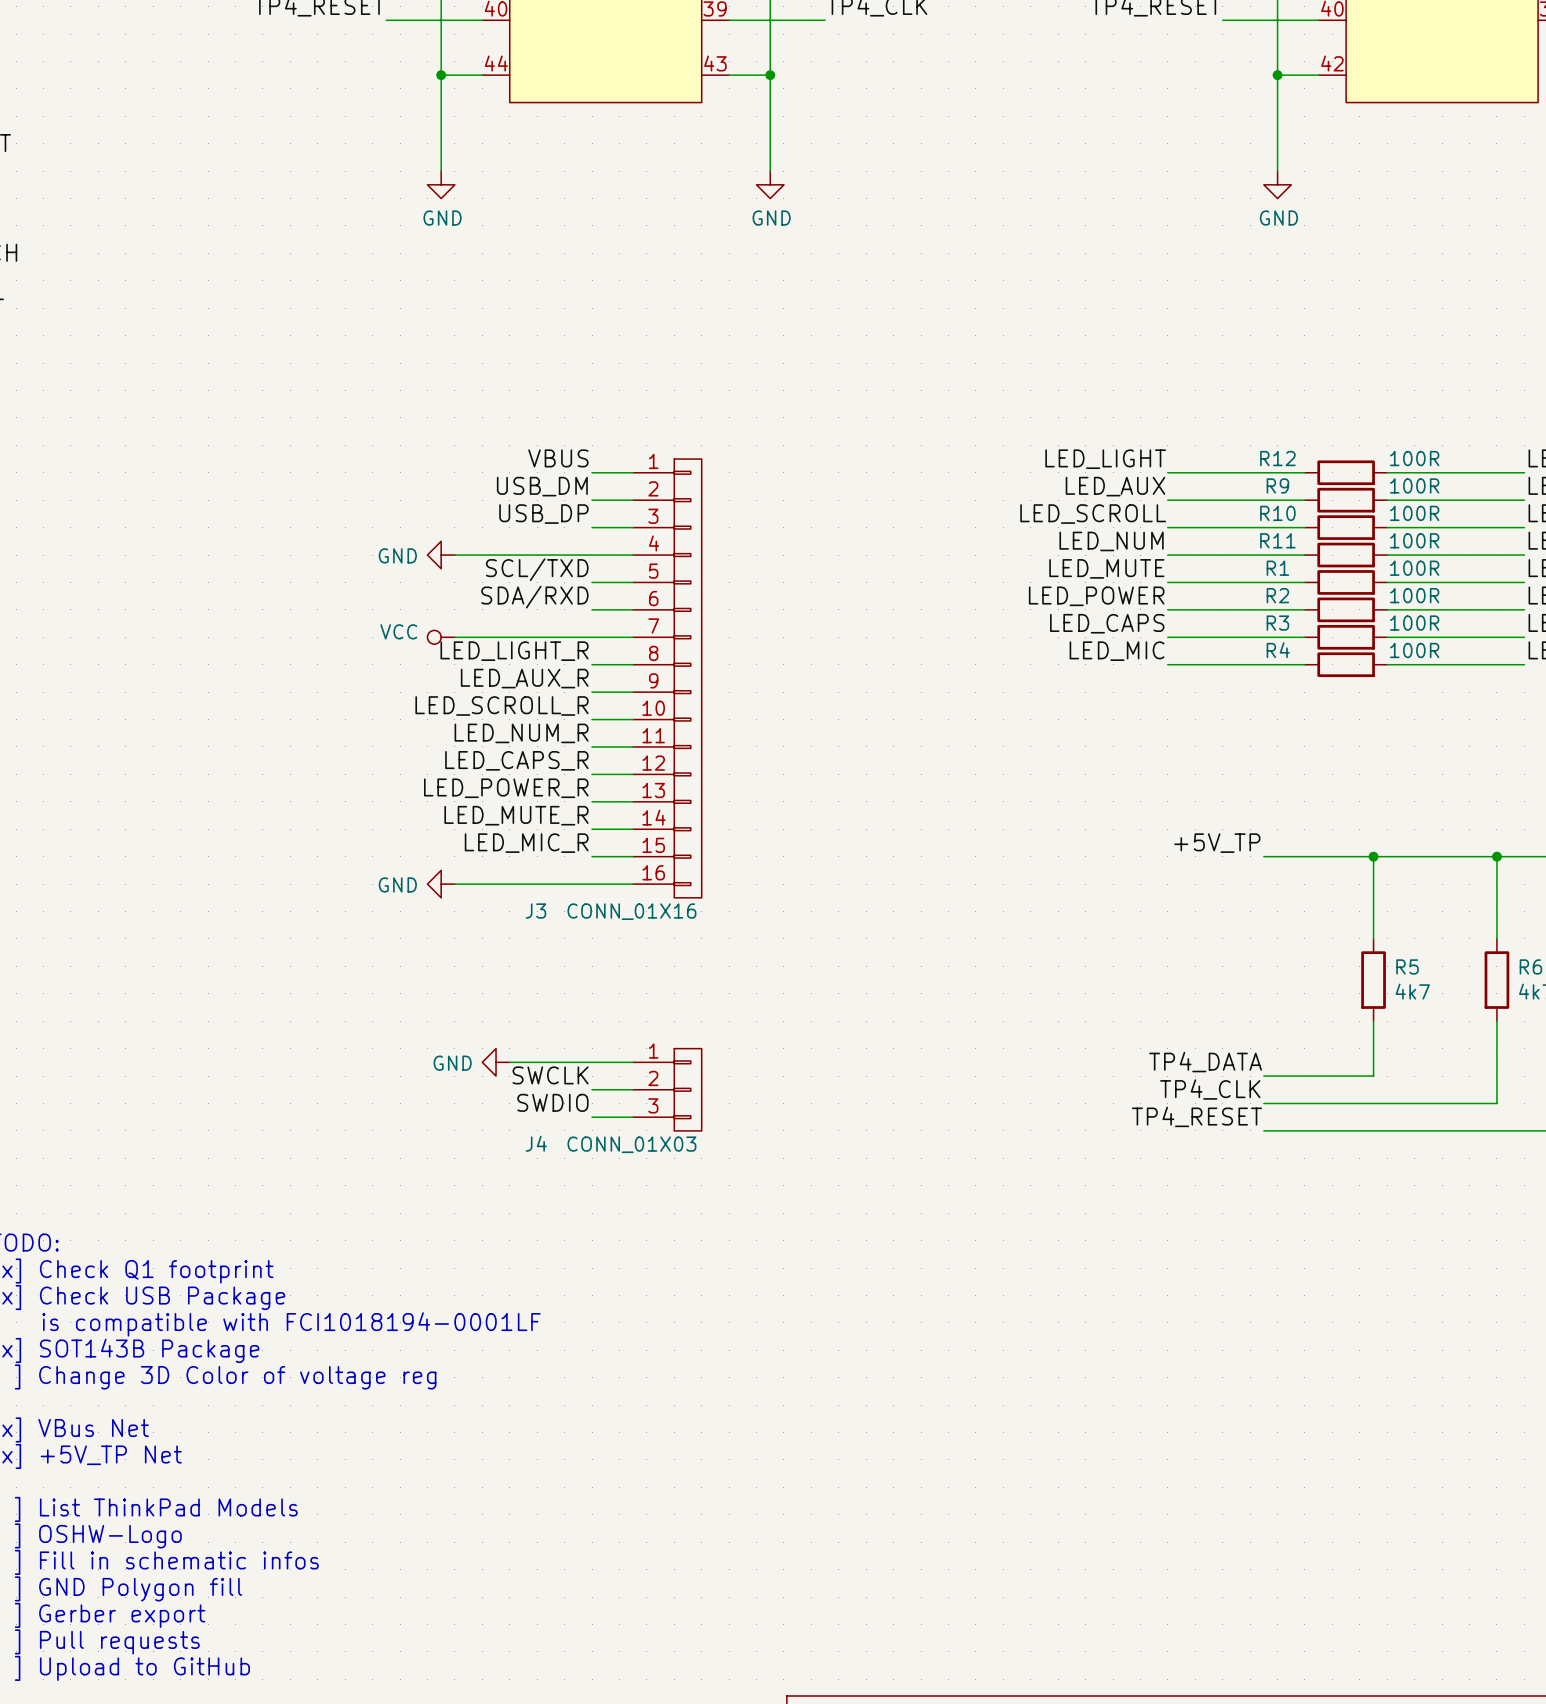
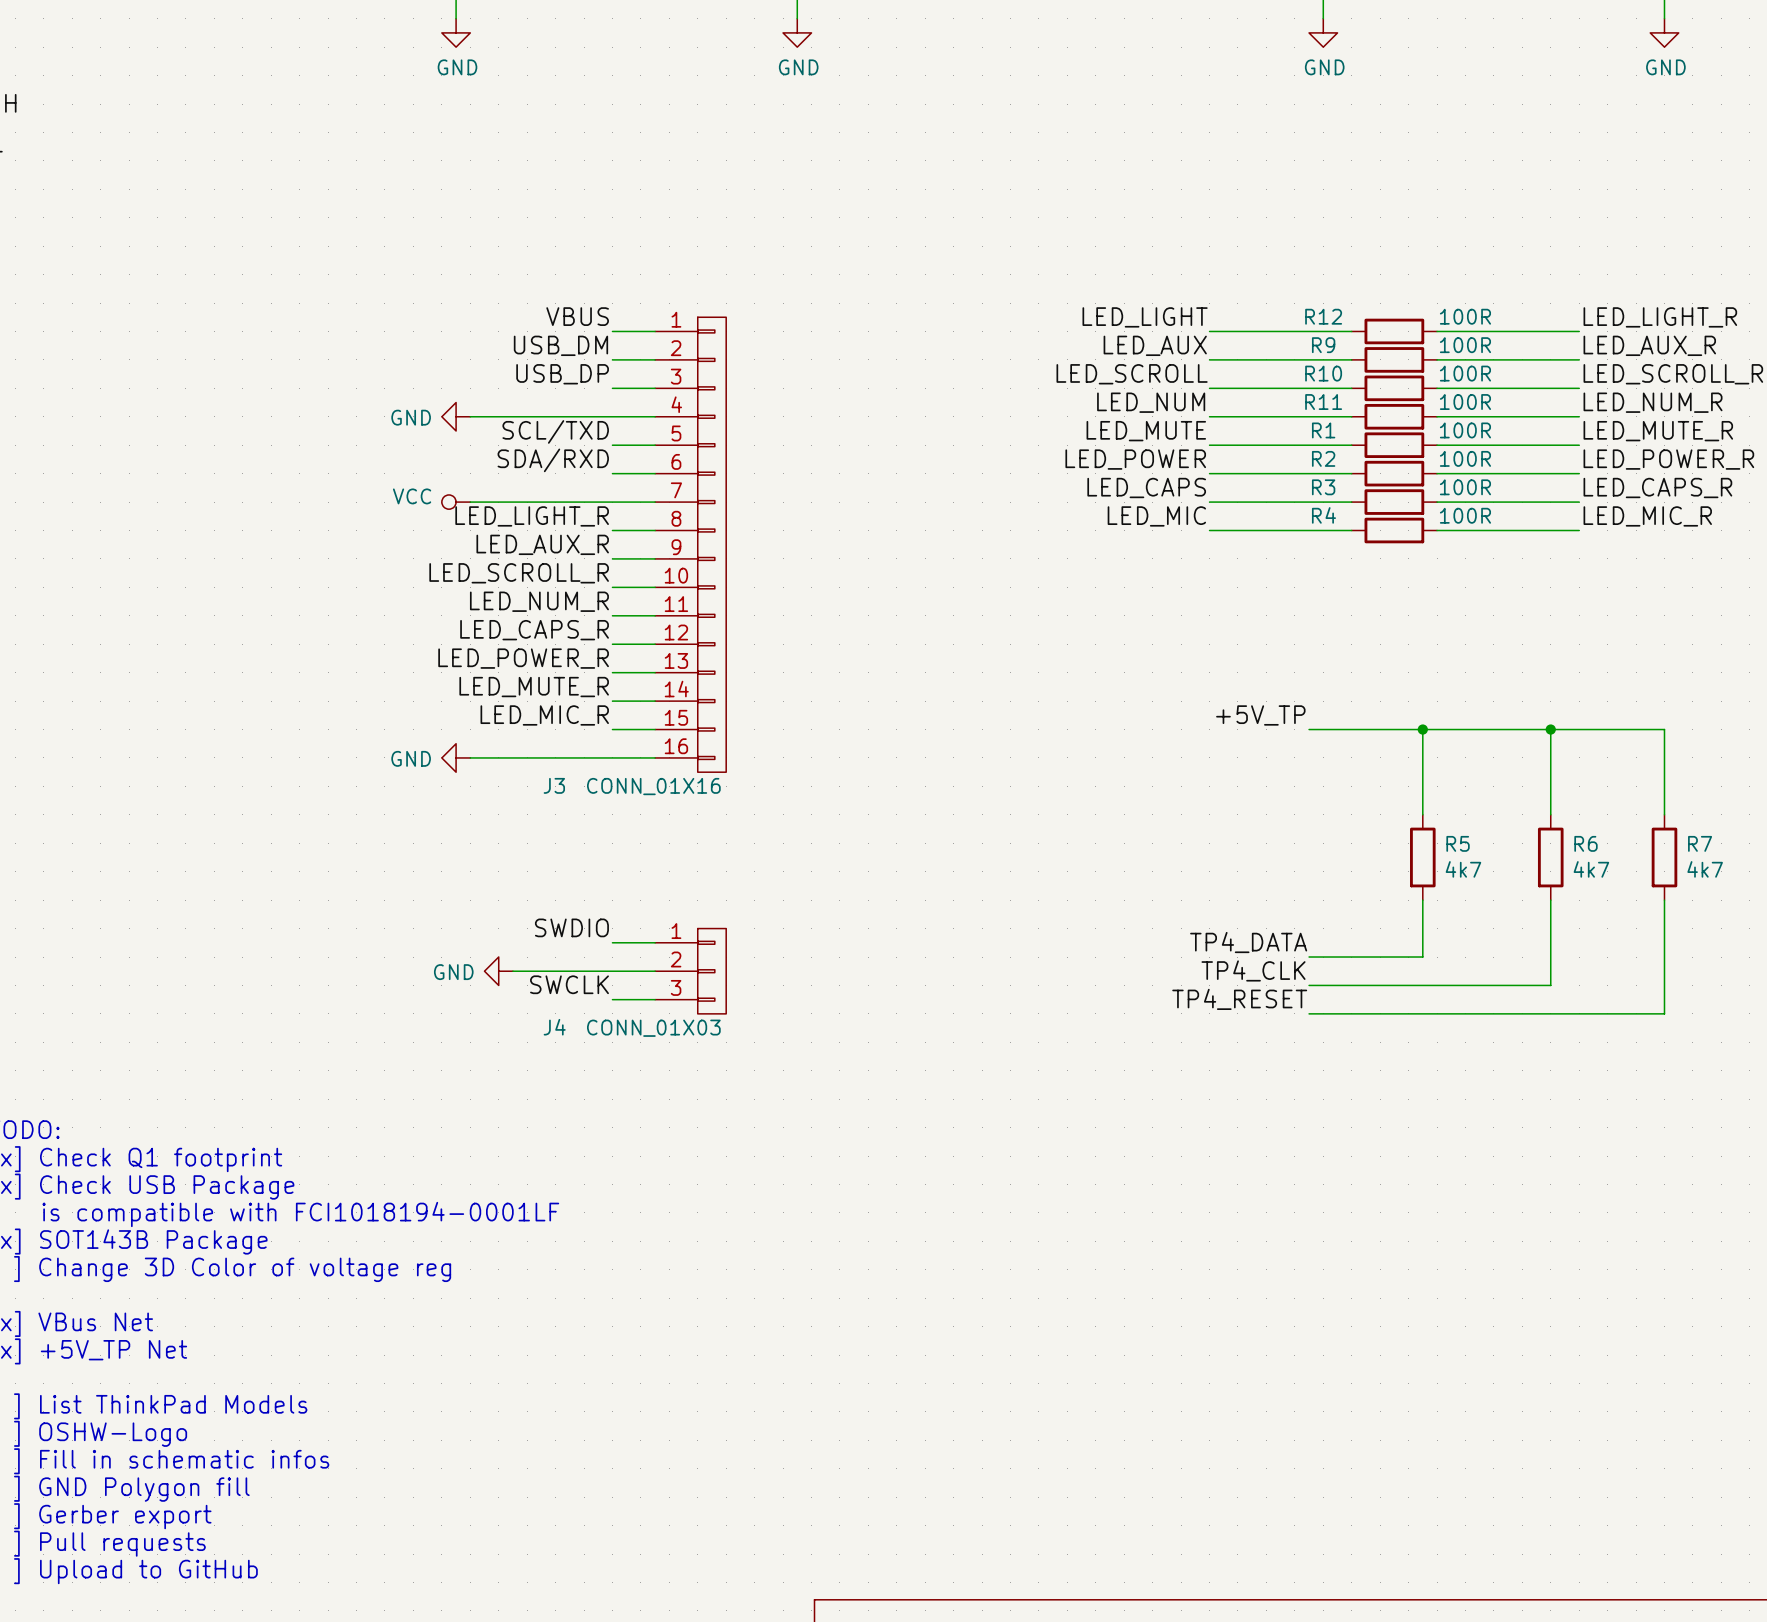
label: none -> SWDIO (571, 927)
power symbol position: GND (496, 1062) -> GND (498, 971)
wire: (509, 1062) (592, 1062) -> none
label: SWCLK (550, 1075) -> none
wire: none -> (512, 971) (612, 971)
label: SWDIO (552, 1102) -> SWCLK (569, 984)

